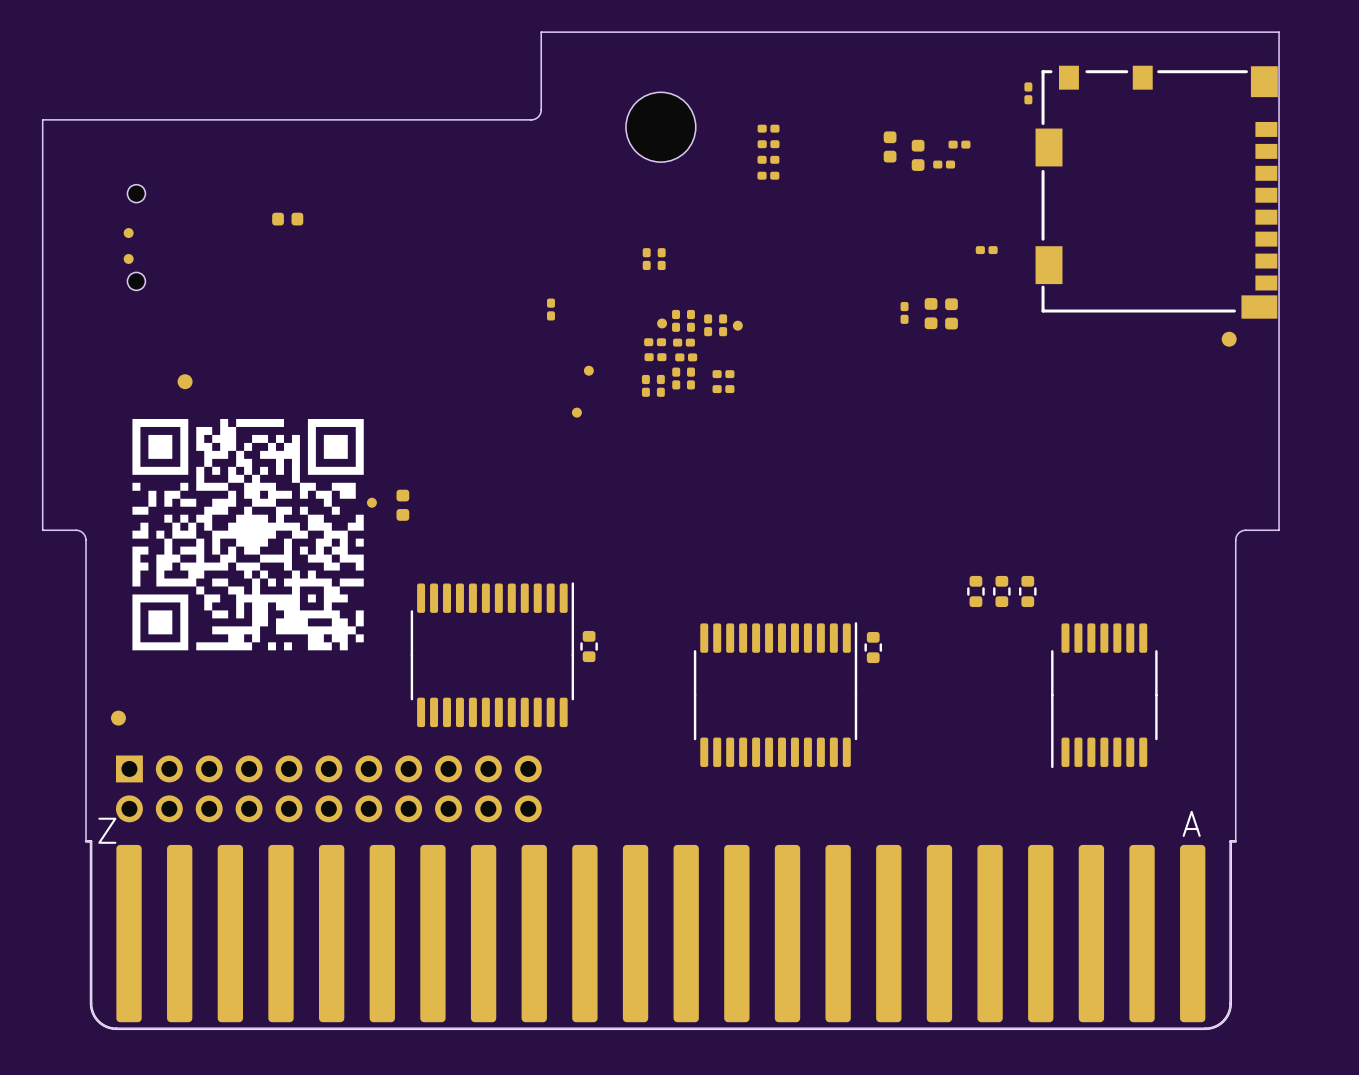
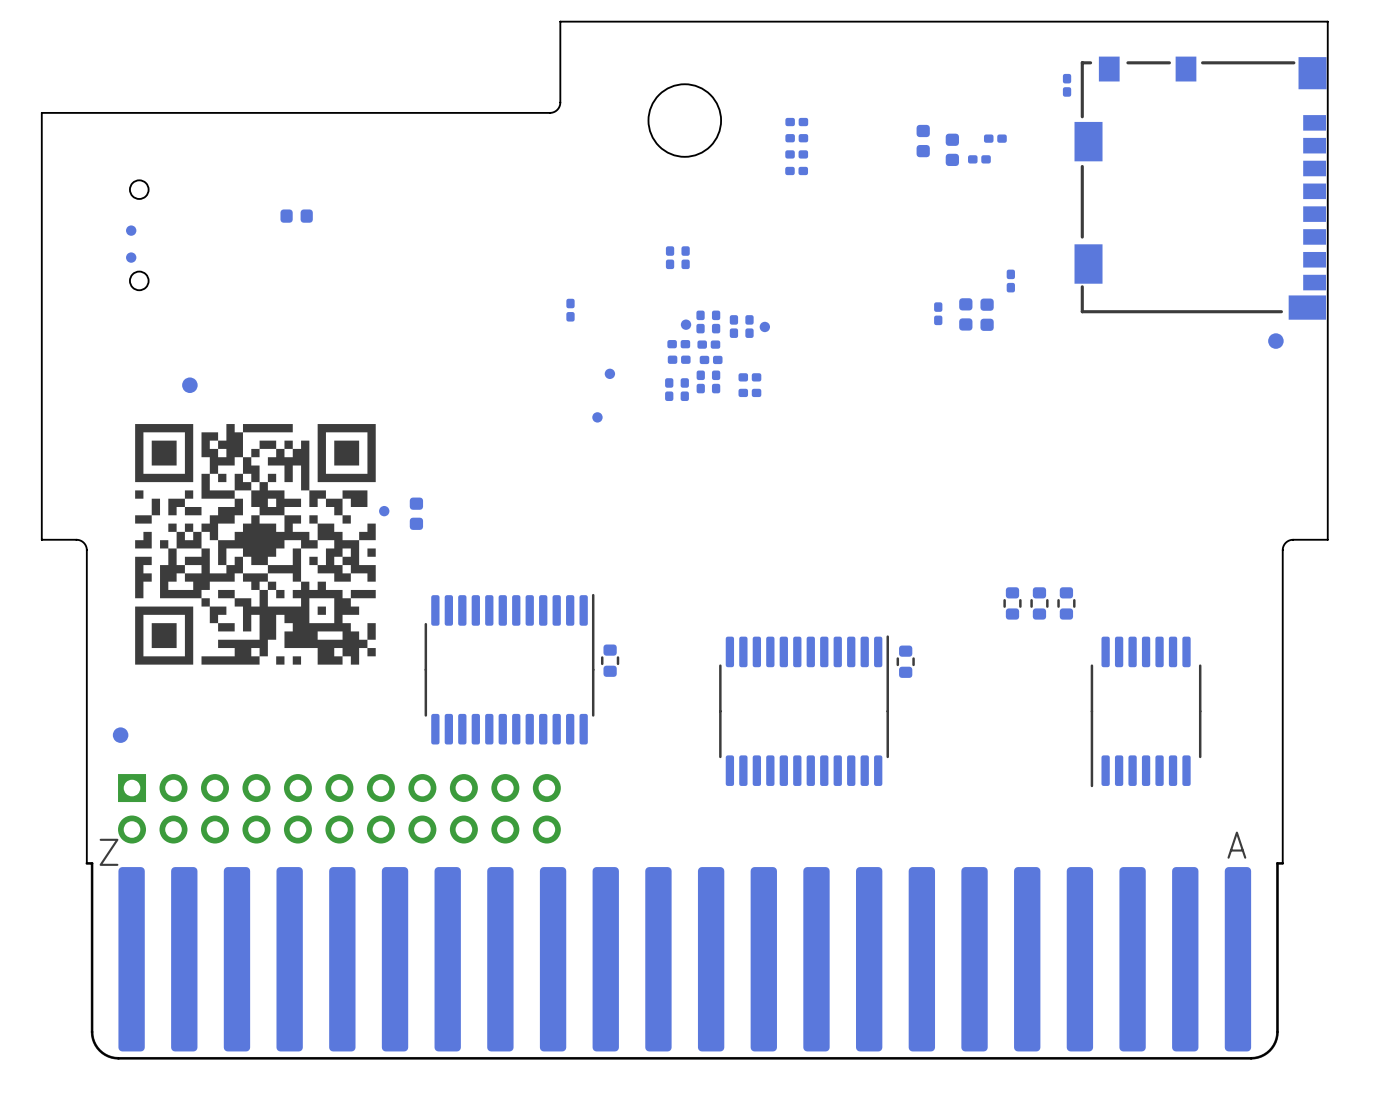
part rotation: 0° (986, 250) -> 90° clockwise (1010, 281)
part position: (986, 250) -> (1010, 281)

